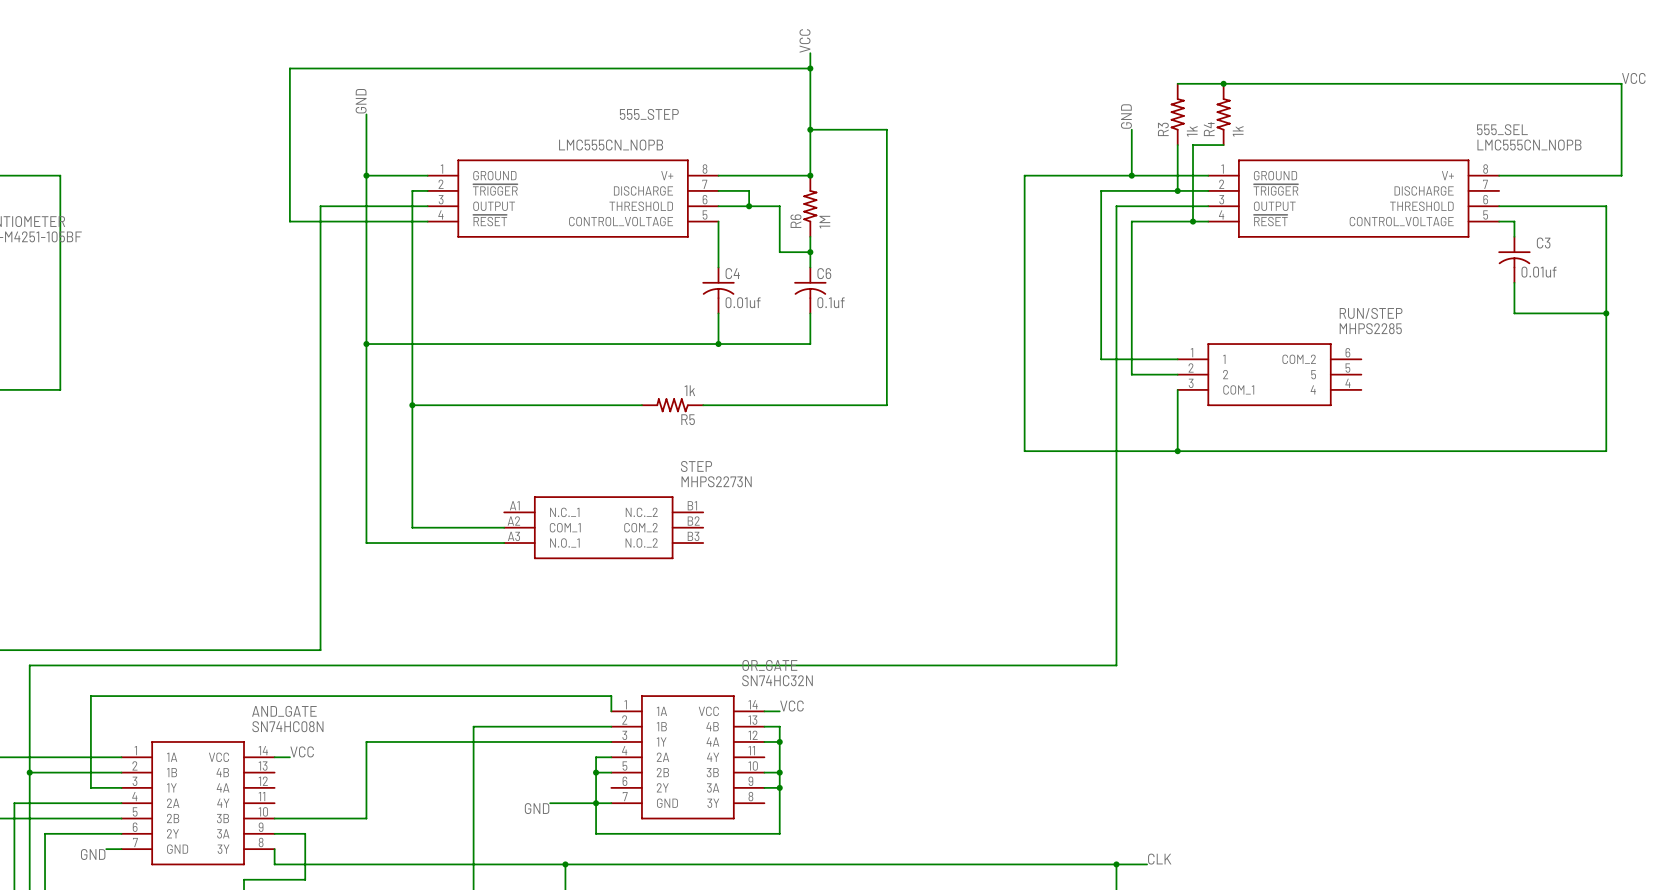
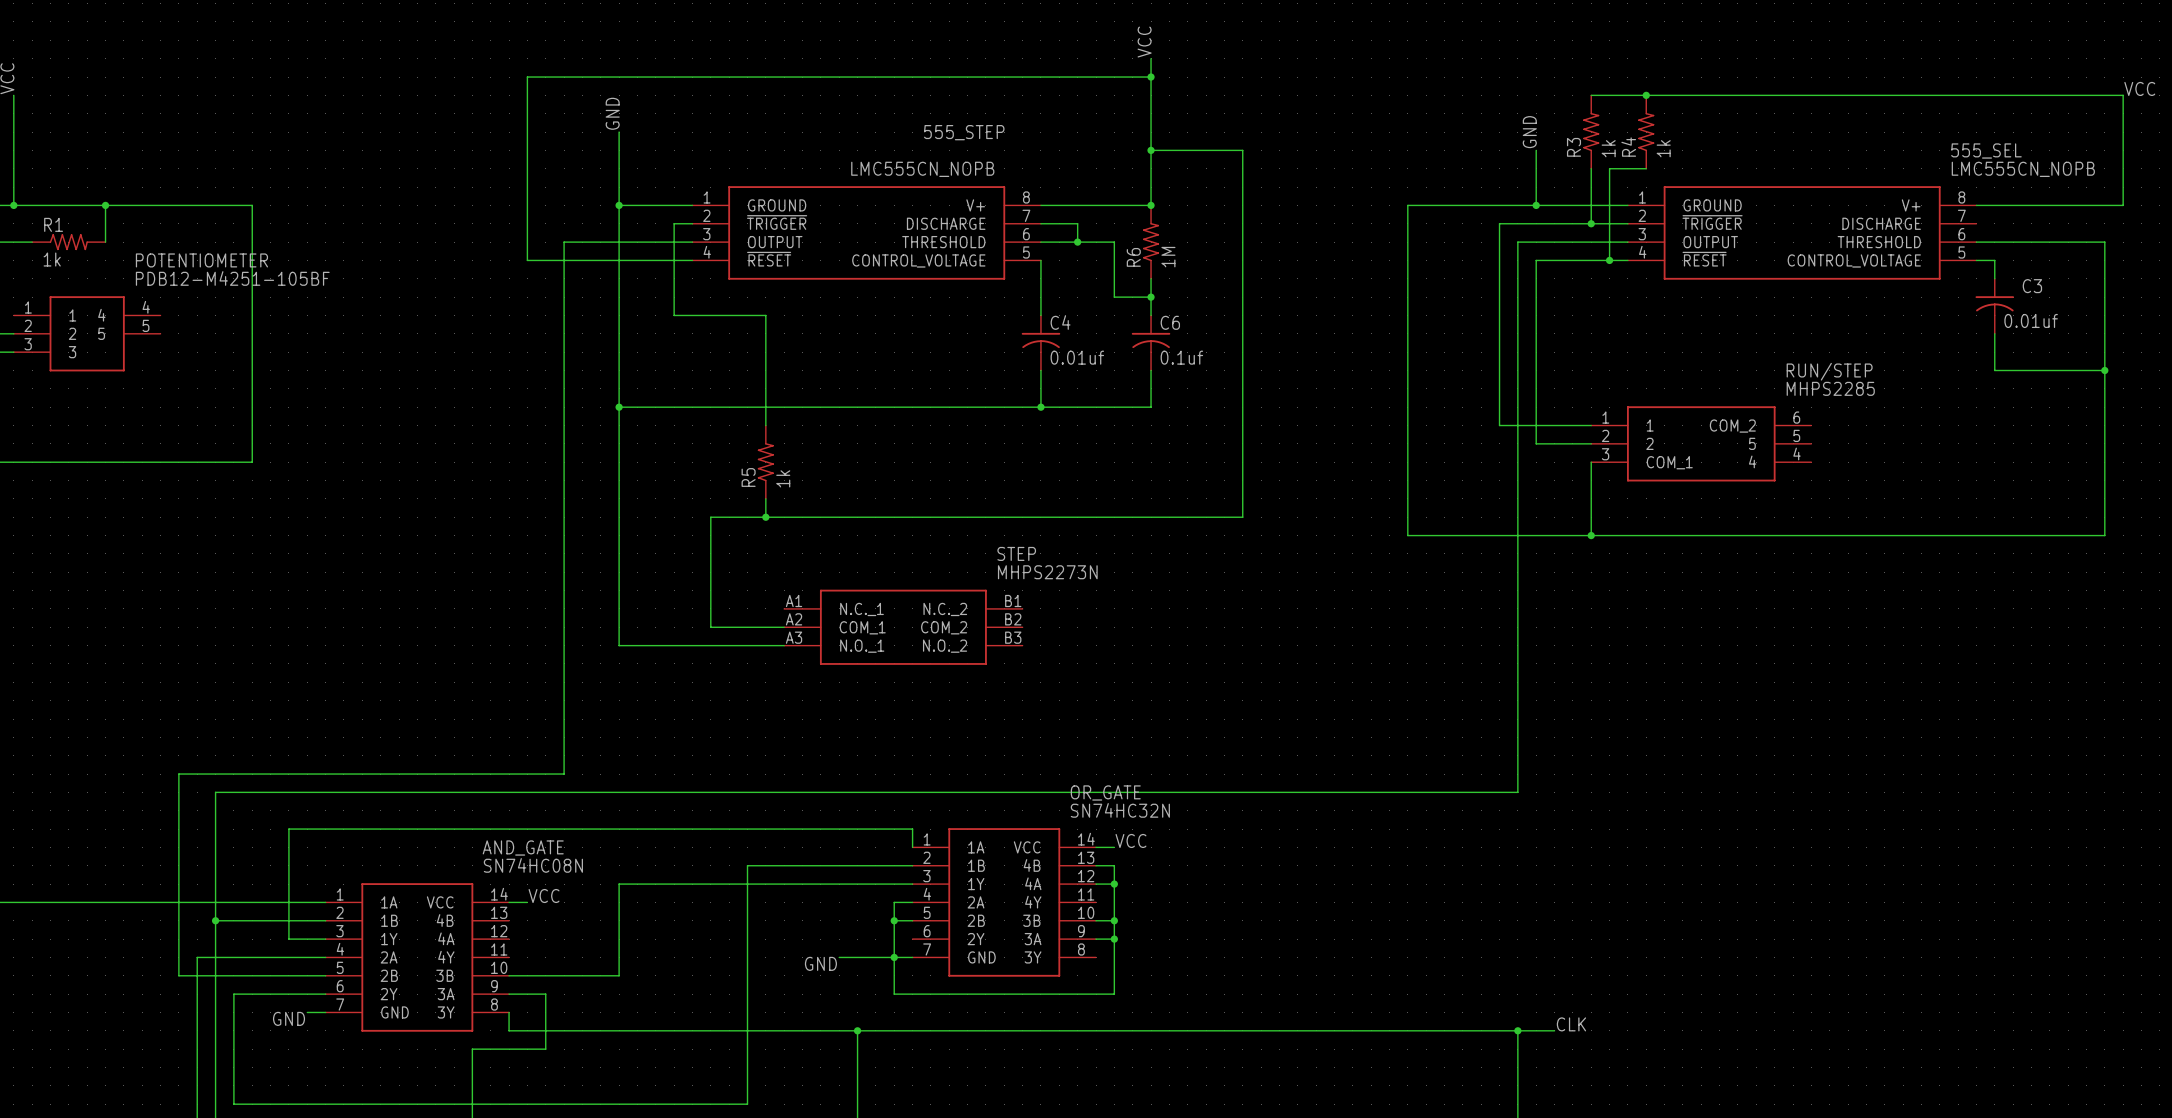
wire: (412, 267) (412, 527) (442, 527) -> (674, 315) (765, 315) (765, 425)
wire: (412, 405) (641, 405) -> none
junction: (412, 405) -> none
R5 rotation: 0° (672, 405) -> 90° clockwise (765, 462)
R5 position: (672, 405) -> (765, 462)
wire: (703, 405) (886, 405) -> (710, 627) (710, 517) (1242, 517) (1242, 480)
wire: none -> (765, 498) (765, 517)
junction: none -> (765, 517)

